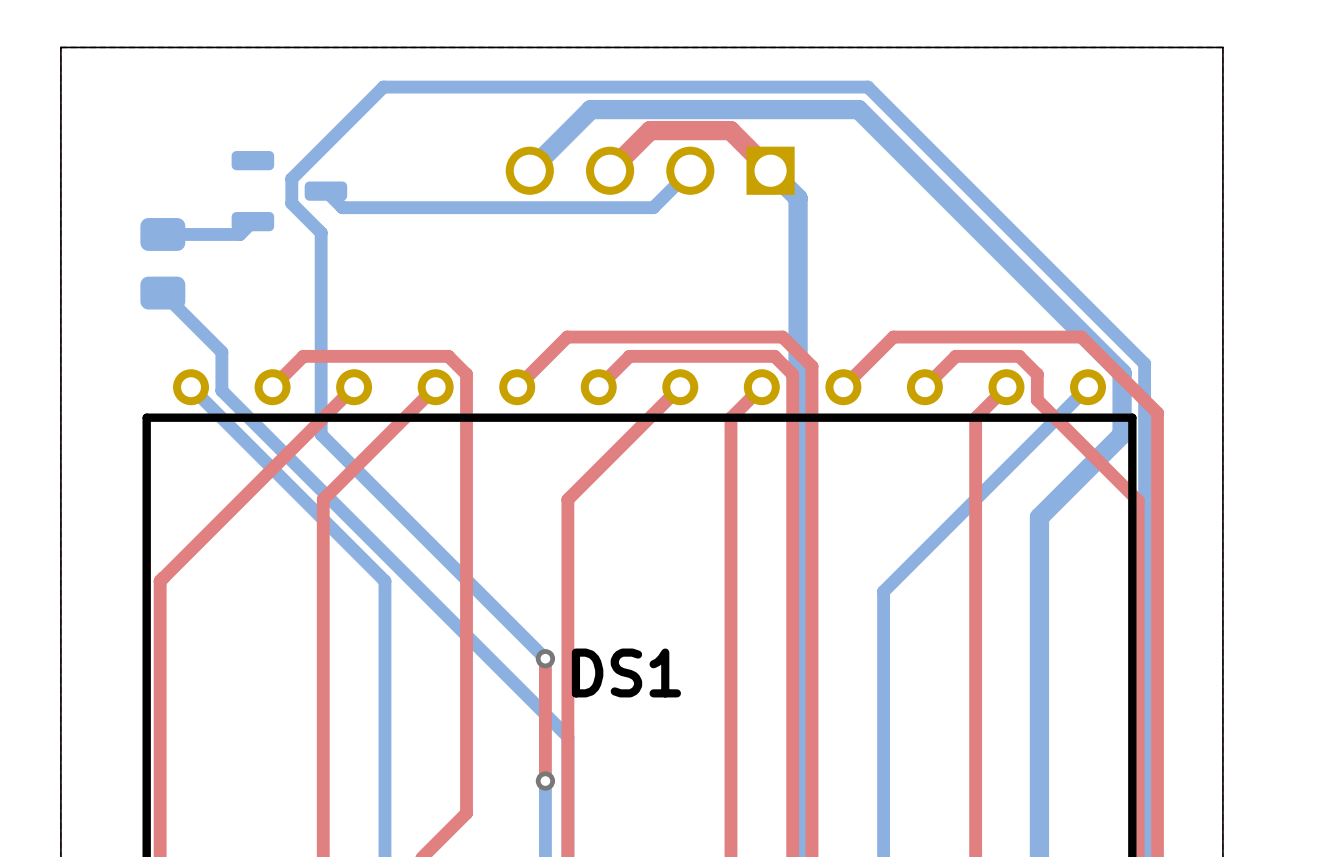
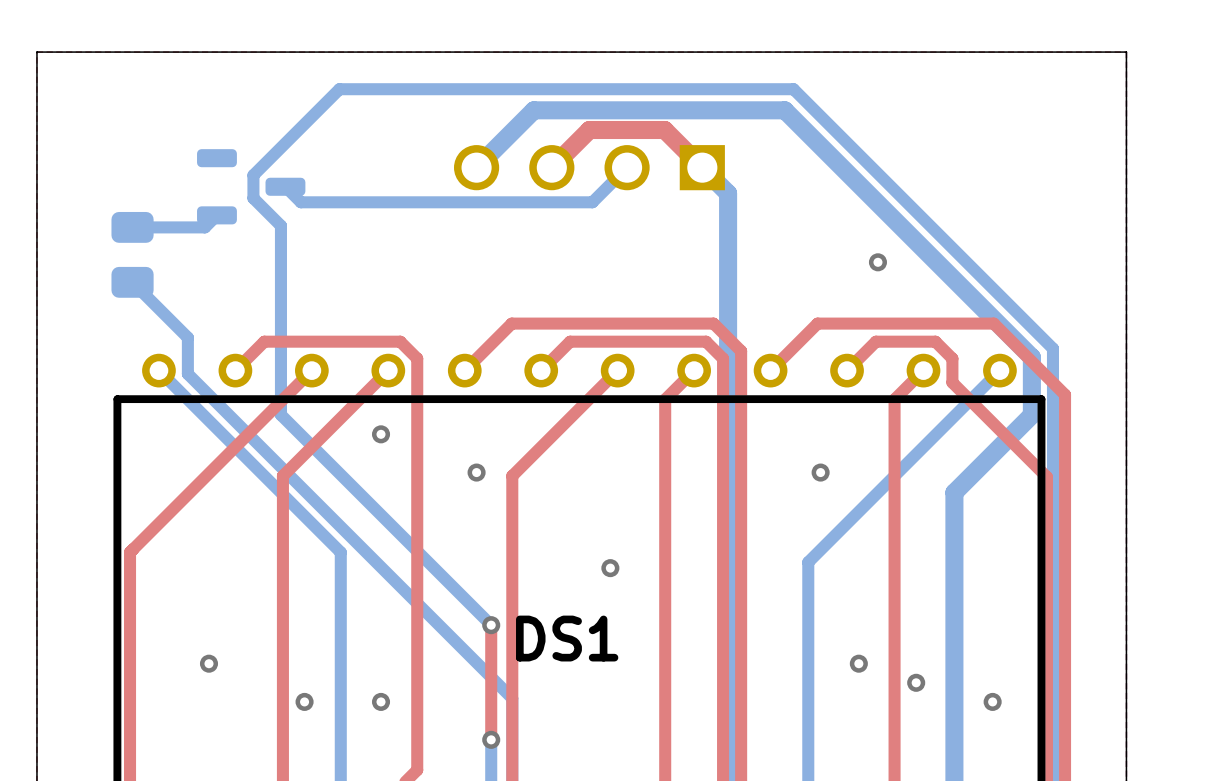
via: none -> (877, 262)
via: none -> (381, 434)
via: none -> (476, 472)
via: none -> (820, 472)
via: none -> (610, 568)
via: none -> (208, 663)
via: none -> (858, 663)
via: none -> (916, 682)
via: none -> (304, 701)
via: none -> (381, 701)
via: none -> (992, 701)

